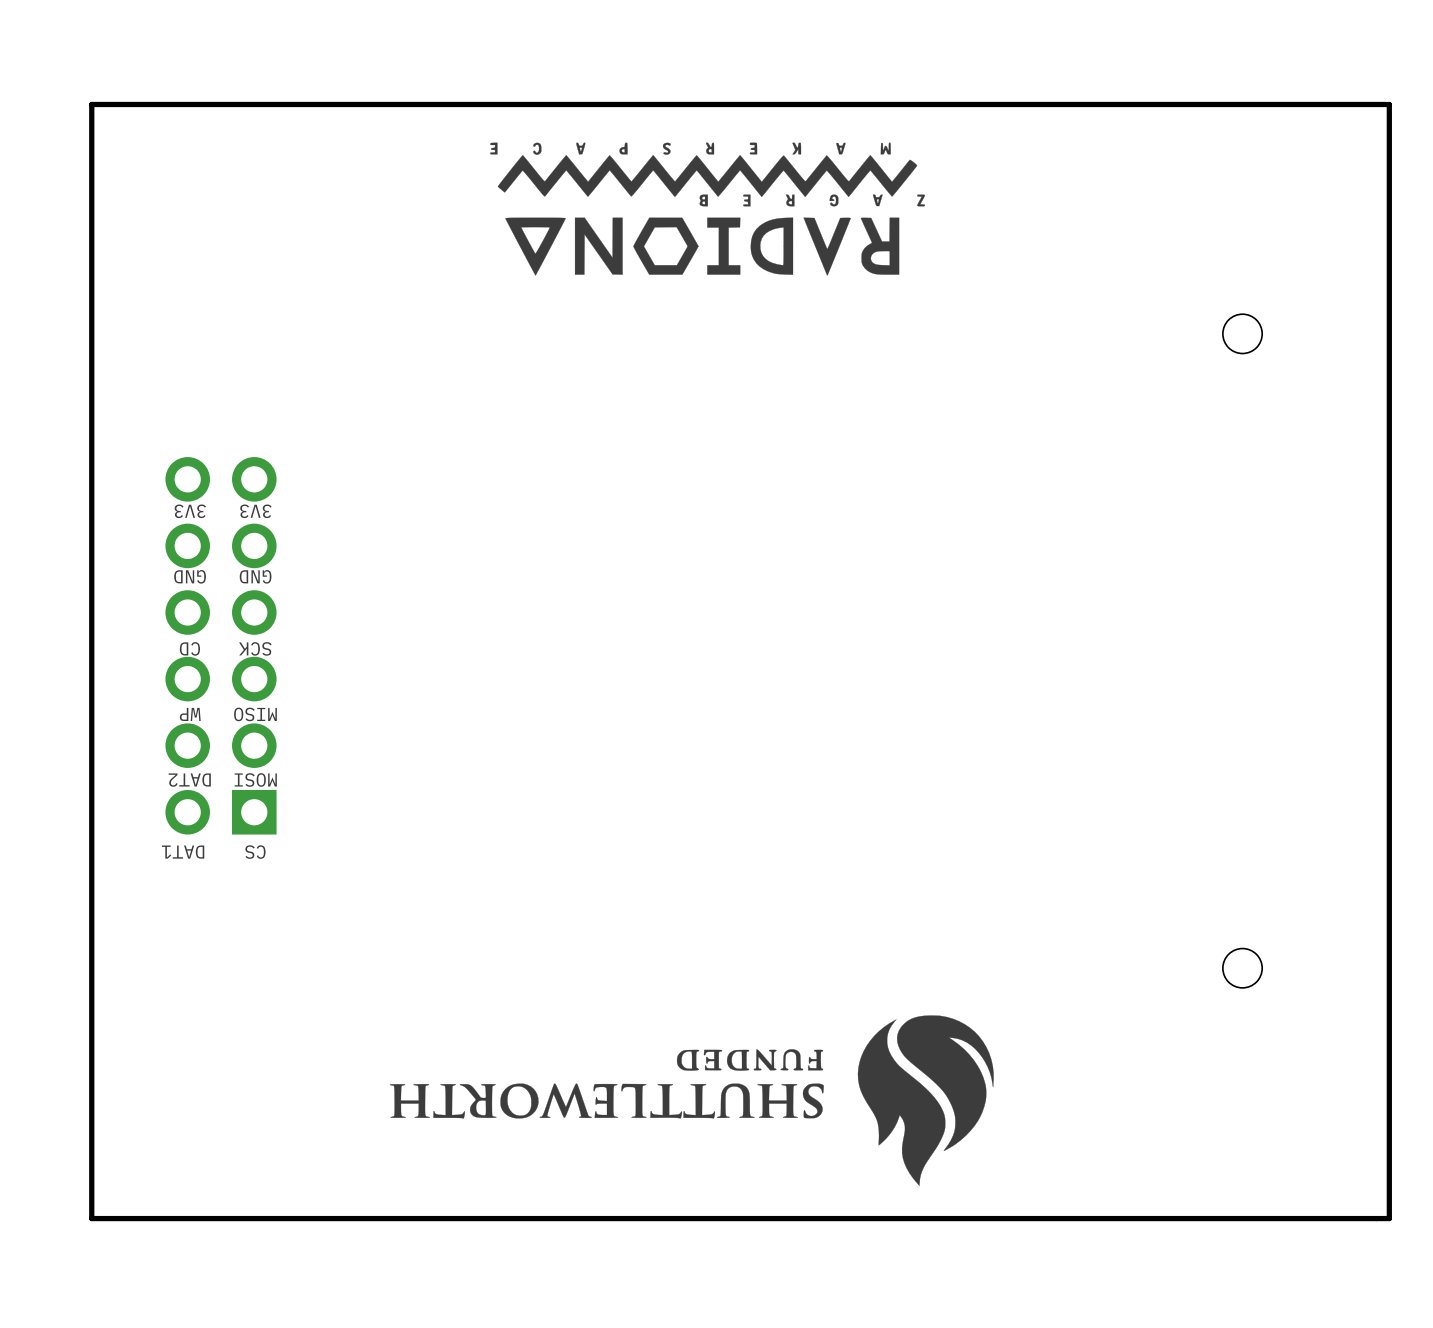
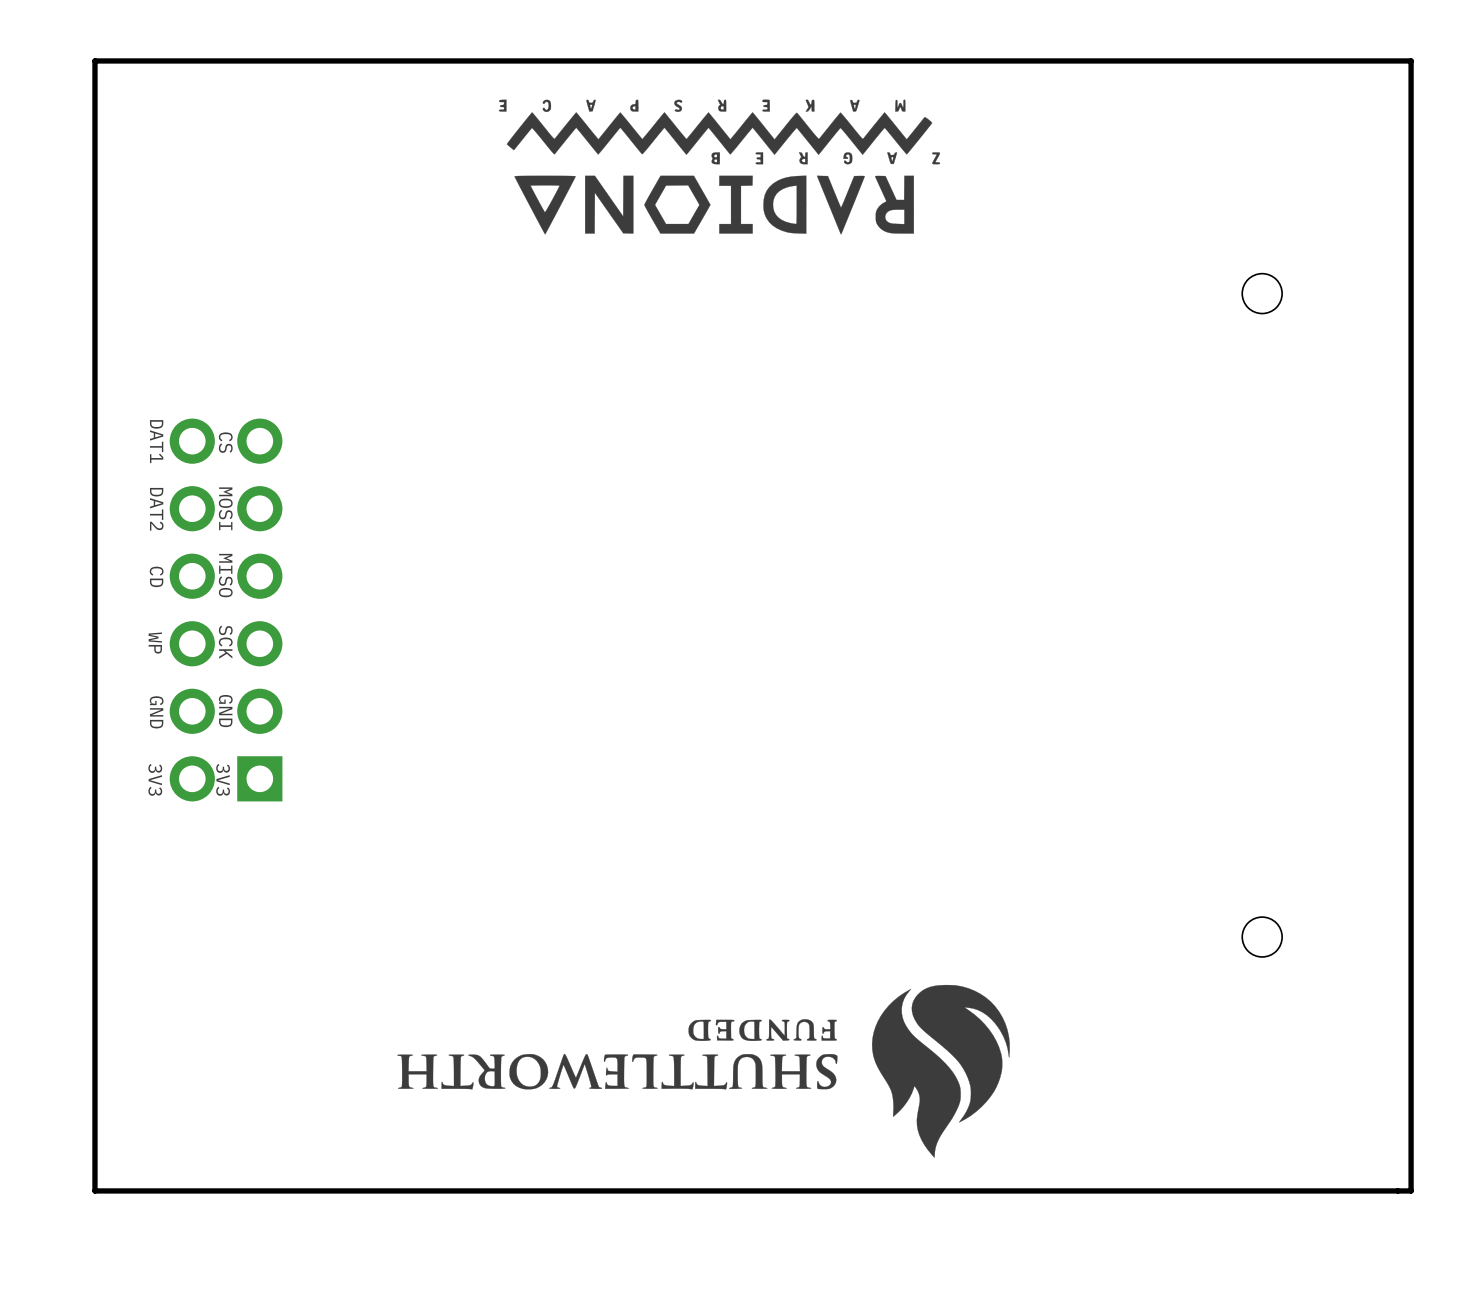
text: 3V3 (190, 511) -> none
text: 3V3 (255, 511) -> none
text: GND (190, 576) -> none
text: GND (255, 576) -> none
text rotation: 0° (189, 648) -> 90° counterclockwise (156, 576)
text position: CD (189, 648) -> CD (156, 576)
text rotation: 0° (255, 648) -> 90° counterclockwise (225, 642)
text position: SCK (255, 648) -> SCK (225, 642)
text rotation: 0° (190, 714) -> 90° counterclockwise (155, 643)
text position: WP (190, 714) -> WP (155, 643)
text rotation: 0° (255, 714) -> 90° counterclockwise (225, 575)
text position: MISO (255, 714) -> MISO (225, 575)
text: none -> GND (225, 711)
text: none -> GND (156, 712)
text rotation: 0° (255, 779) -> 90° counterclockwise (225, 508)
text position: MOSI (255, 779) -> MOSI (225, 508)
text rotation: 0° (189, 780) -> 90° counterclockwise (156, 509)
text position: DAT2 (189, 780) -> DAT2 (156, 509)
text: none -> 3V3 (155, 779)
text: none -> 3V3 (223, 779)
text rotation: 0° (183, 852) -> 90° counterclockwise (156, 441)
text position: DAT1 (183, 852) -> DAT1 (156, 441)
text rotation: 0° (255, 852) -> 90° counterclockwise (225, 442)
text position: CS (255, 852) -> CS (225, 442)

